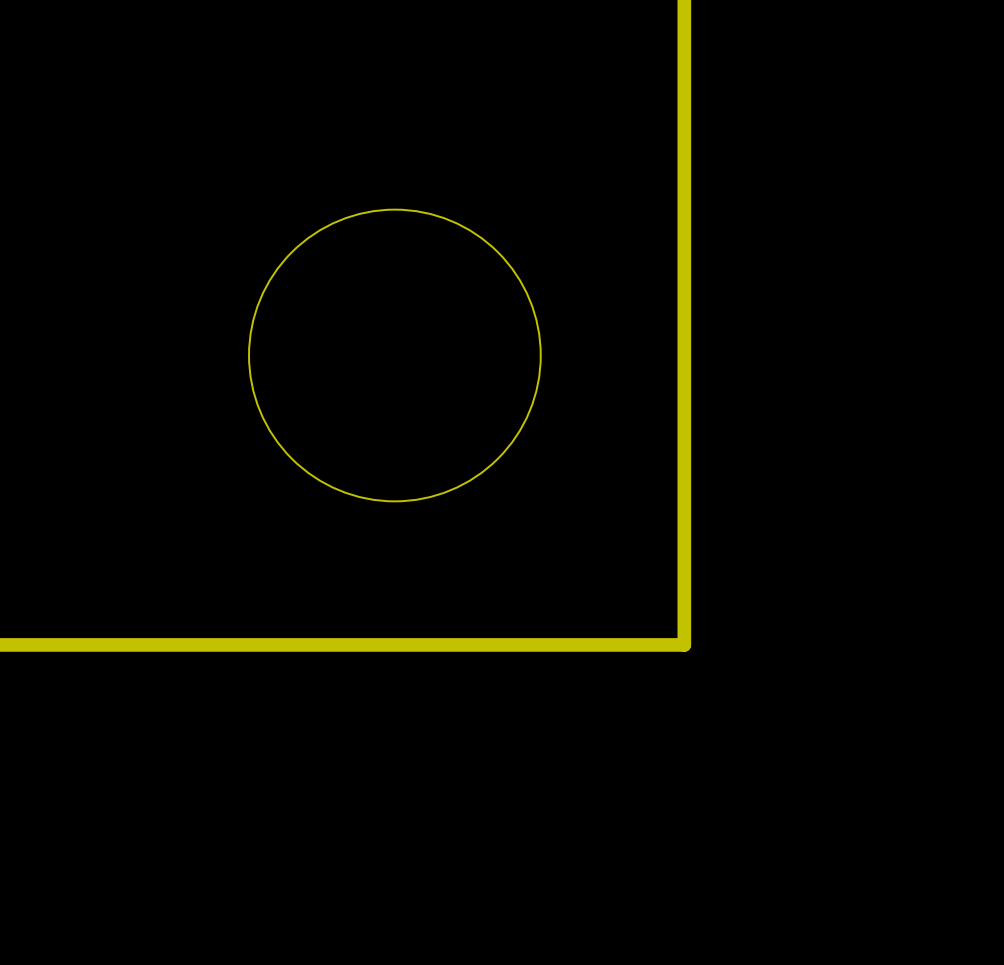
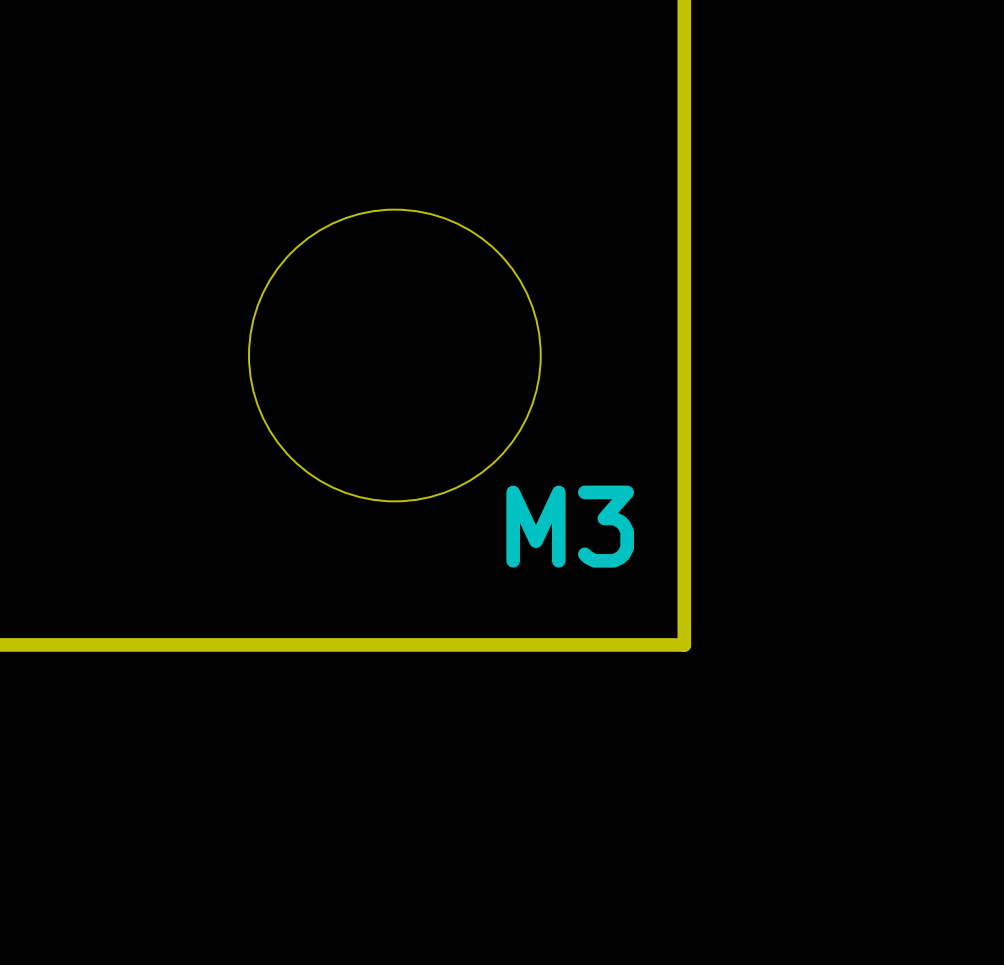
text: none -> M3 (570, 526)

